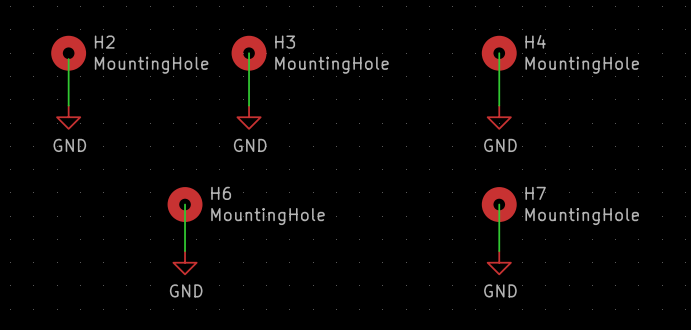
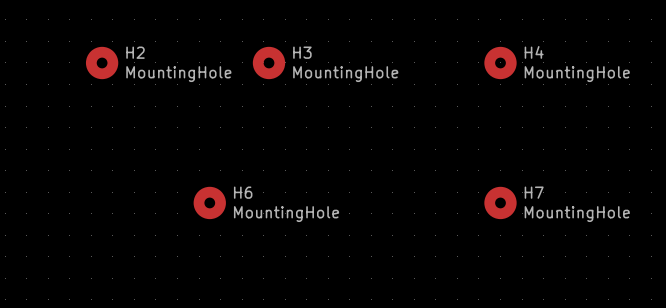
wire: (249, 53) (249, 105) -> none
wire: (499, 53) (499, 105) -> none
wire: (68, 59) (68, 105) -> none
power symbol: GND (68, 117) -> none
power symbol: GND (249, 117) -> none
power symbol: GND (499, 117) -> none
wire: (185, 204) (185, 251) -> none
wire: (499, 204) (499, 251) -> none
power symbol: GND (185, 262) -> none
power symbol: GND (499, 262) -> none

